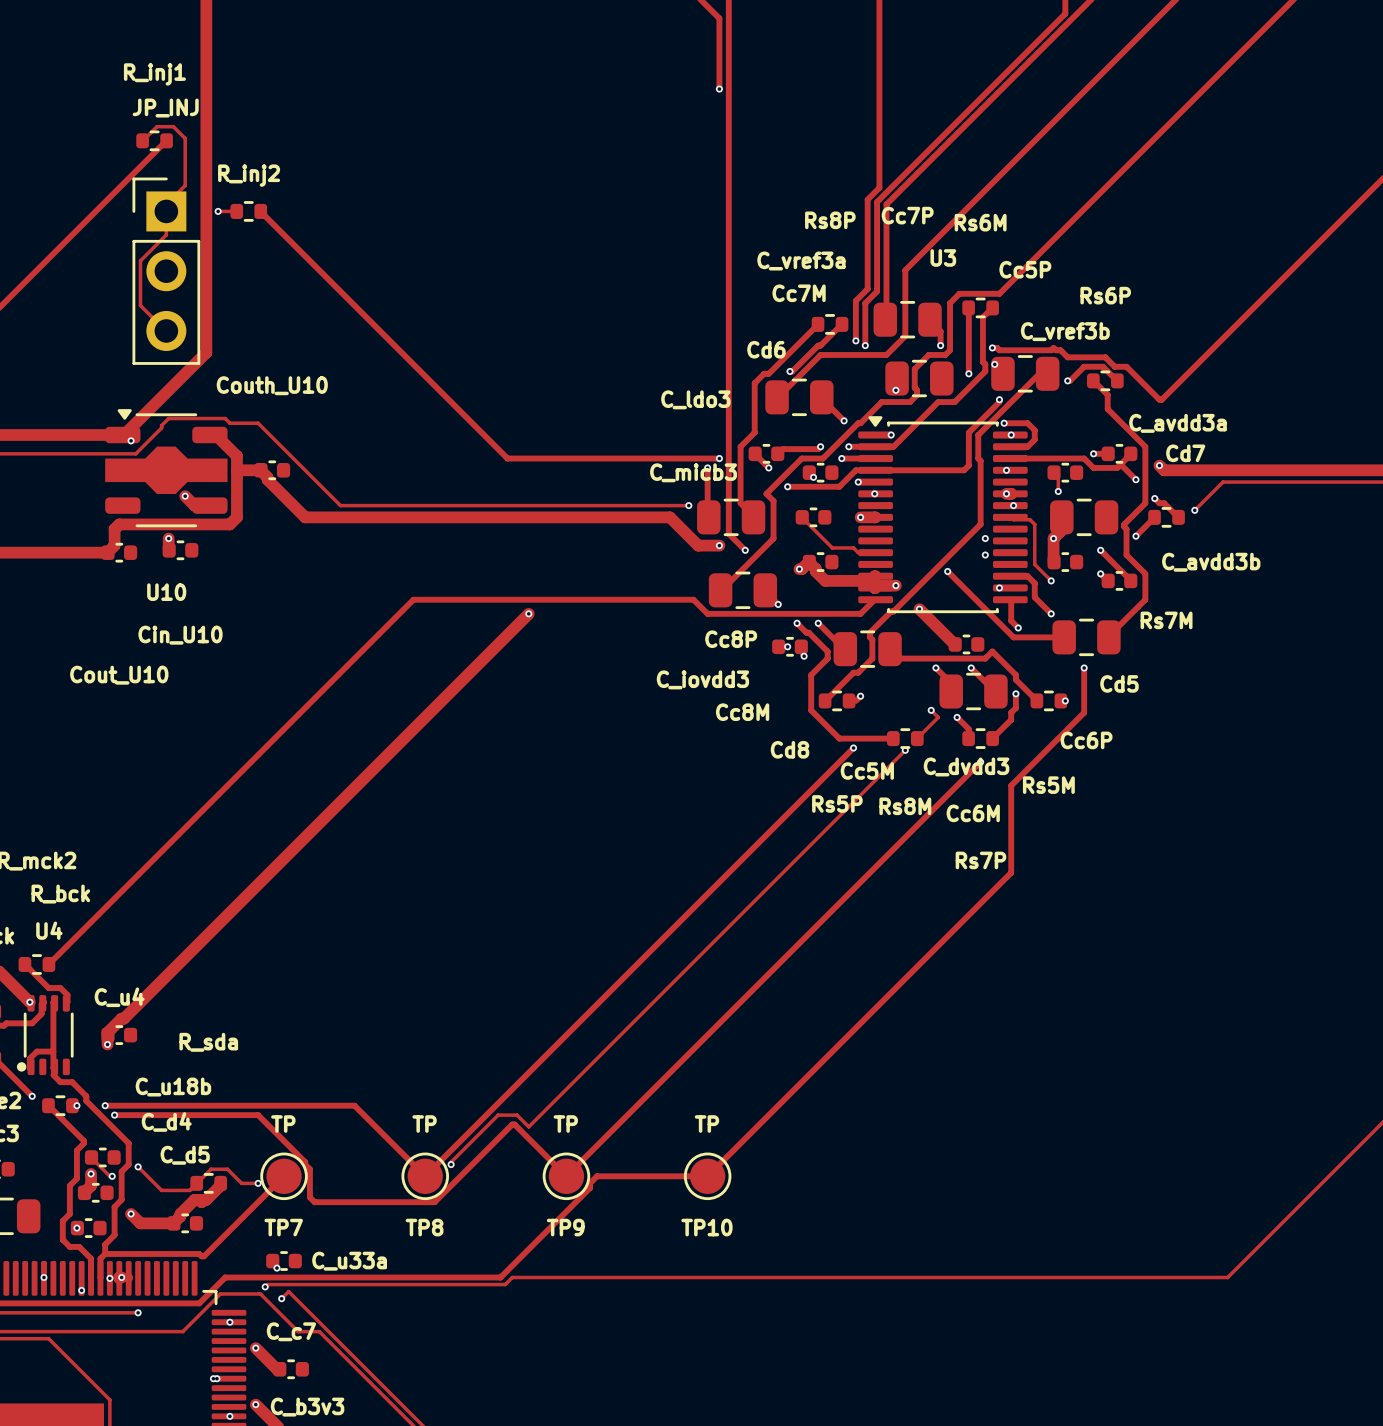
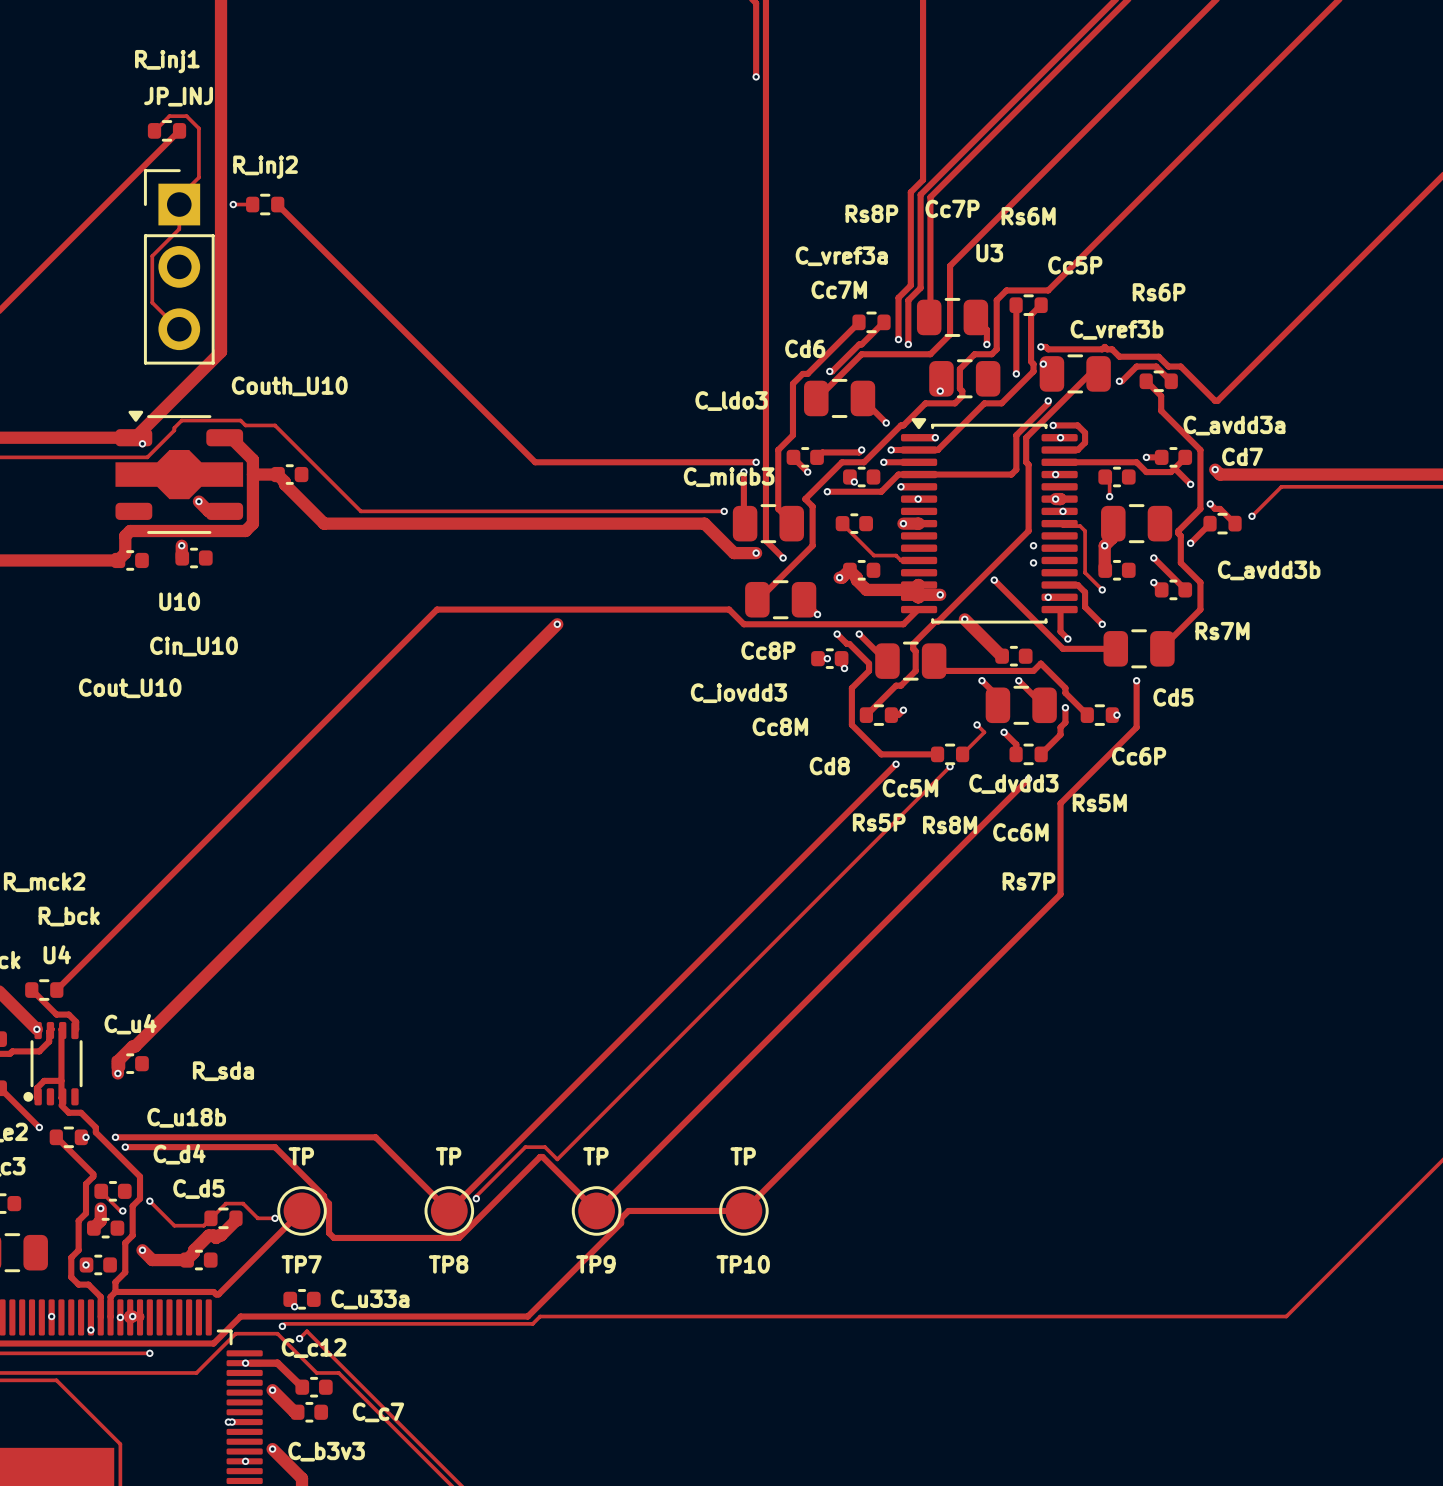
track: none -> (250, 1363) (277, 1363) (302, 1387)
C_c7 name position: C_c7 (291, 1331) -> C_c7 (378, 1412)
C_c12: none -> (314, 1387)

